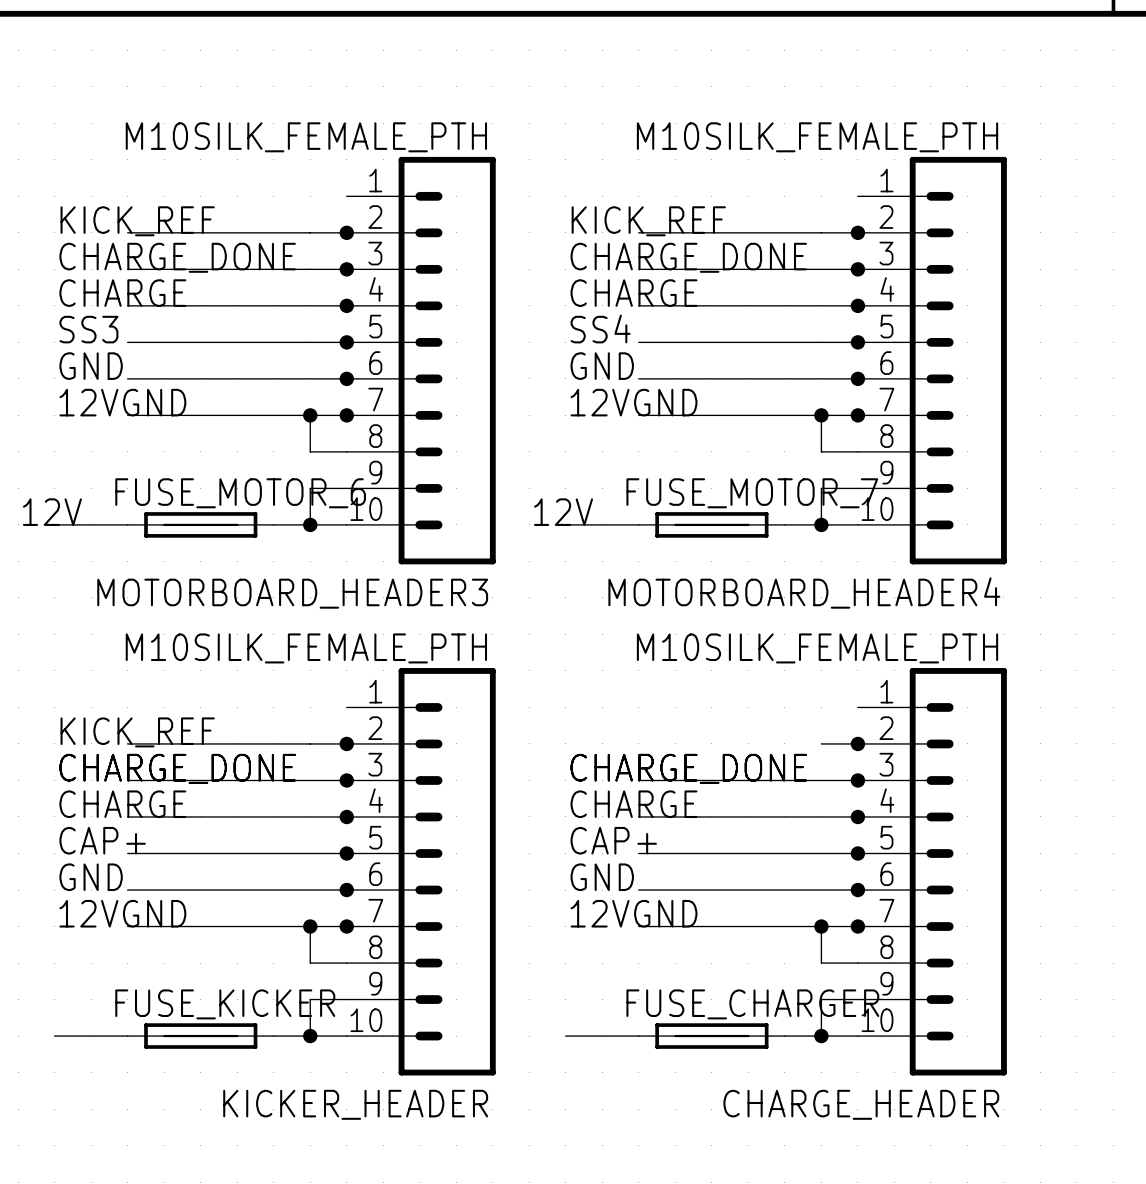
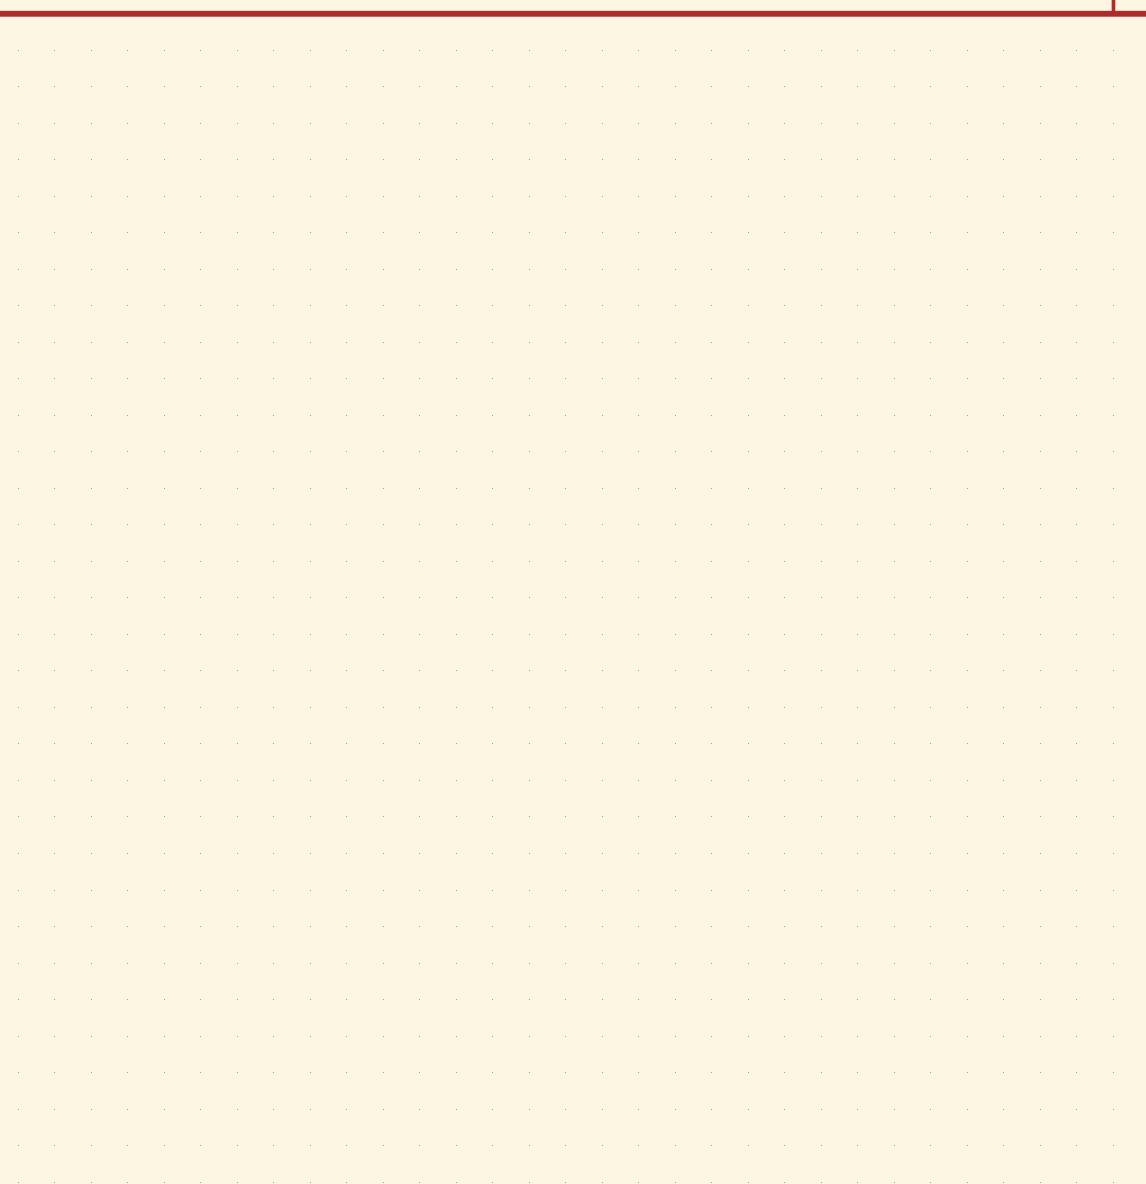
label: KICK_REF (137, 221) -> none
label: KICK_REF (648, 221) -> none
wire: (127, 232) (346, 232) -> none
junction: (346, 232) -> none
wire: (638, 232) (857, 232) -> none
junction: (857, 232) -> none
label: CHARGE_DONE (177, 257) -> none
label: CHARGE_DONE (688, 257) -> none
wire: (127, 269) (346, 269) -> none
junction: (346, 269) -> none
wire: (638, 269) (857, 269) -> none
junction: (857, 269) -> none
label: CHARGE (122, 293) -> none
label: CHARGE (634, 293) -> none
wire: (127, 305) (346, 305) -> none
junction: (346, 305) -> none
wire: (638, 305) (857, 305) -> none
junction: (857, 305) -> none
label: SS4 (600, 328) -> none
label: SS3 (88, 329) -> none
wire: (127, 342) (346, 342) -> none
junction: (346, 342) -> none
wire: (638, 342) (857, 342) -> none
junction: (857, 342) -> none
MOTORBOARD_HEADER3: M10SILK_FEMALE_PTH (421, 360) -> none
MOTORBOARD_HEADER4: M10SILK_FEMALE_PTH (932, 360) -> none
label: GND (91, 366) -> none
label: GND (602, 366) -> none
wire: (127, 378) (346, 378) -> none
junction: (346, 378) -> none
wire: (638, 378) (857, 378) -> none
junction: (857, 378) -> none
label: 12VGND (122, 402) -> none
label: 12VGND (634, 402) -> none
wire: (127, 415) (346, 415) -> none
wire: (310, 415) (310, 451) (346, 451) -> none
junction: (310, 415) -> none
junction: (346, 415) -> none
wire: (638, 415) (857, 415) -> none
wire: (821, 415) (821, 451) (857, 451) -> none
junction: (821, 415) -> none
junction: (857, 415) -> none
wire: (346, 488) (310, 488) (310, 524) -> none
wire: (857, 488) (821, 488) (821, 524) -> none
label: 12V (52, 512) -> none
label: 12V (563, 512) -> none
wire: (54, 524) (127, 524) -> none
FUSE_MOTOR_6: (200, 524) -> none
wire: (273, 524) (346, 524) -> none
junction: (310, 524) -> none
wire: (565, 524) (638, 524) -> none
FUSE_MOTOR_7: (711, 524) -> none
wire: (784, 524) (857, 524) -> none
junction: (821, 524) -> none
label: KICK_REF (137, 732) -> none
wire: (127, 743) (346, 743) -> none
junction: (346, 743) -> none
wire: (821, 743) (857, 743) -> none
junction: (857, 743) -> none
label: CHARGE_DONE (177, 768) -> none
label: CHARGE_DONE (688, 768) -> none
wire: (127, 780) (346, 780) -> none
junction: (346, 780) -> none
wire: (638, 780) (857, 780) -> none
junction: (857, 780) -> none
label: CHARGE (122, 804) -> none
label: CHARGE (634, 804) -> none
wire: (127, 816) (346, 816) -> none
junction: (346, 816) -> none
wire: (638, 816) (857, 816) -> none
junction: (857, 816) -> none
label: CAP+ (102, 840) -> none
label: CAP+ (613, 840) -> none
wire: (127, 853) (346, 853) -> none
junction: (346, 853) -> none
wire: (638, 853) (857, 853) -> none
junction: (857, 853) -> none
KICKER_HEADER: M10SILK_FEMALE_PTH (421, 871) -> none
CHARGE_HEADER: M10SILK_FEMALE_PTH (932, 871) -> none
label: GND (91, 877) -> none
label: GND (602, 877) -> none
wire: (127, 890) (346, 890) -> none
junction: (346, 890) -> none
wire: (638, 890) (857, 890) -> none
junction: (857, 890) -> none
label: 12VGND (122, 913) -> none
label: 12VGND (634, 913) -> none
wire: (127, 926) (346, 926) -> none
wire: (310, 926) (310, 963) (346, 963) -> none
junction: (310, 926) -> none
junction: (346, 926) -> none
wire: (638, 926) (857, 926) -> none
wire: (821, 926) (821, 963) (857, 963) -> none
junction: (821, 926) -> none
junction: (857, 926) -> none
wire: (346, 999) (310, 999) (310, 1036) -> none
wire: (857, 999) (821, 999) (821, 1036) -> none
wire: (54, 1036) (127, 1036) -> none
FUSE_KICKER: (200, 1036) -> none
wire: (273, 1036) (346, 1036) -> none
junction: (310, 1036) -> none
wire: (565, 1036) (638, 1036) -> none
FUSE_CHARGER: (711, 1036) -> none
wire: (784, 1036) (857, 1036) -> none
junction: (821, 1036) -> none

